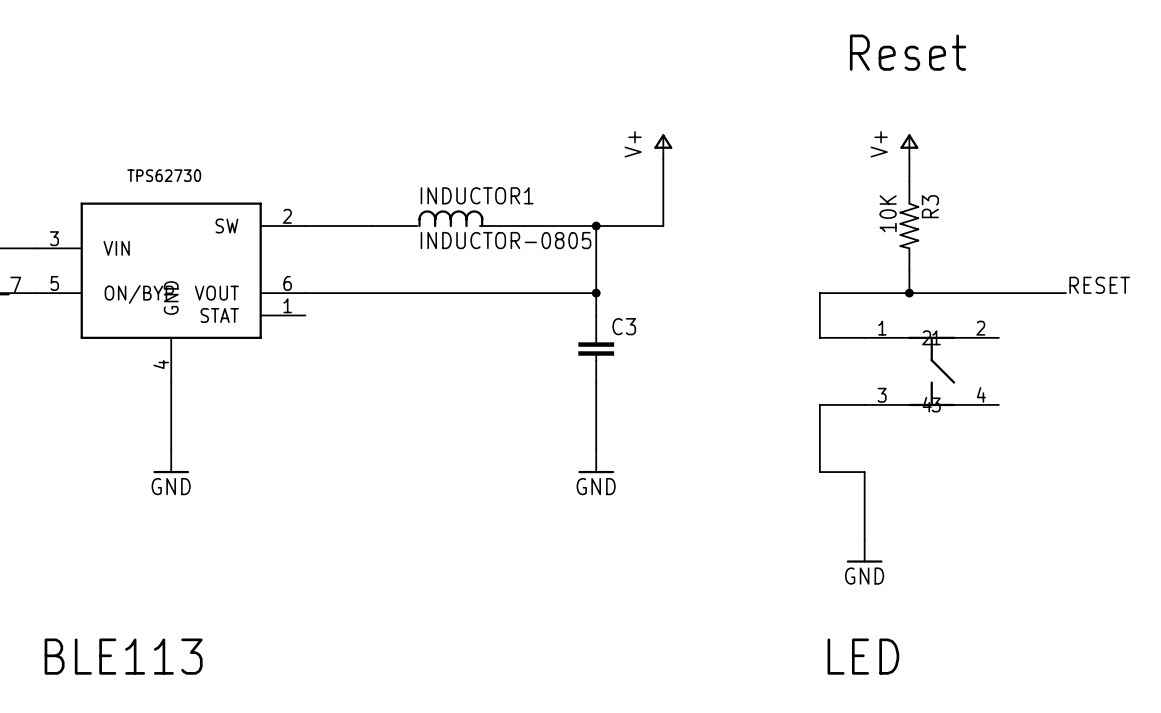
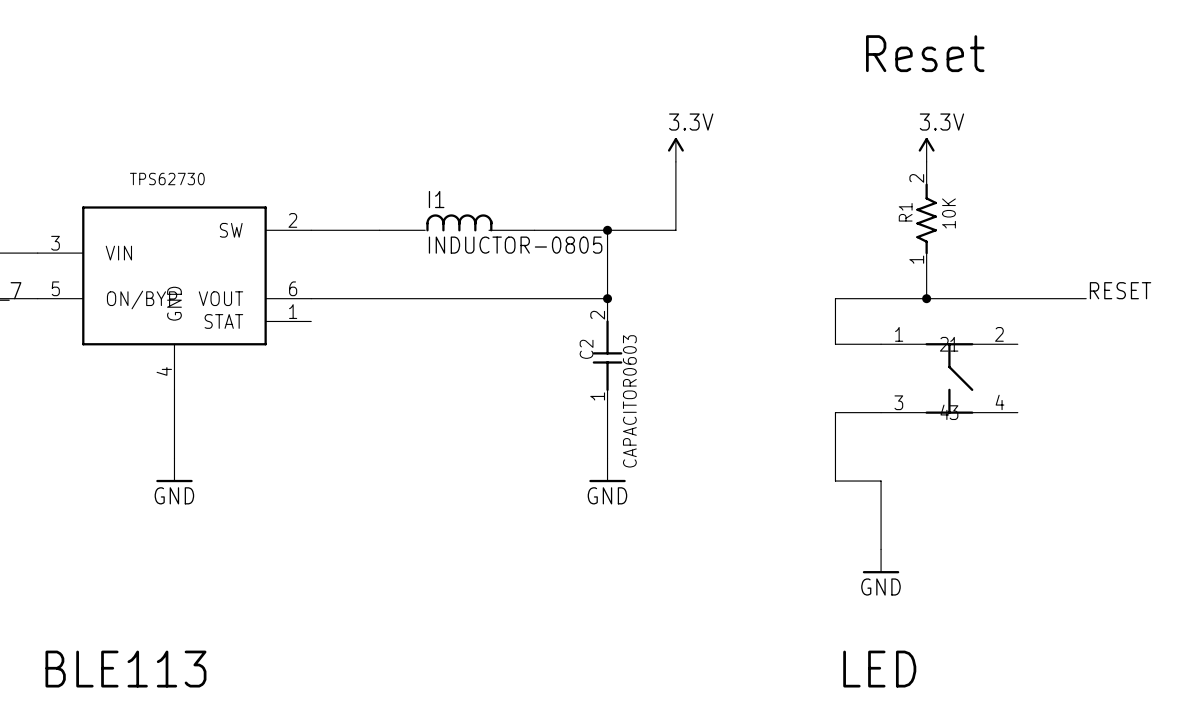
power symbol: V+ (663, 146) -> 3.3V (675, 149)
power symbol: V+ (909, 146) -> 3.3V (926, 149)
INDUCTOR1 name: INDUCTOR1 (477, 195) -> I1 (436, 199)
R1: none -> 10K (926, 218)
R3: 10K (909, 226) -> none
C3: (596, 349) -> none
C2: none -> CAPACITOR0603 (607, 355)

